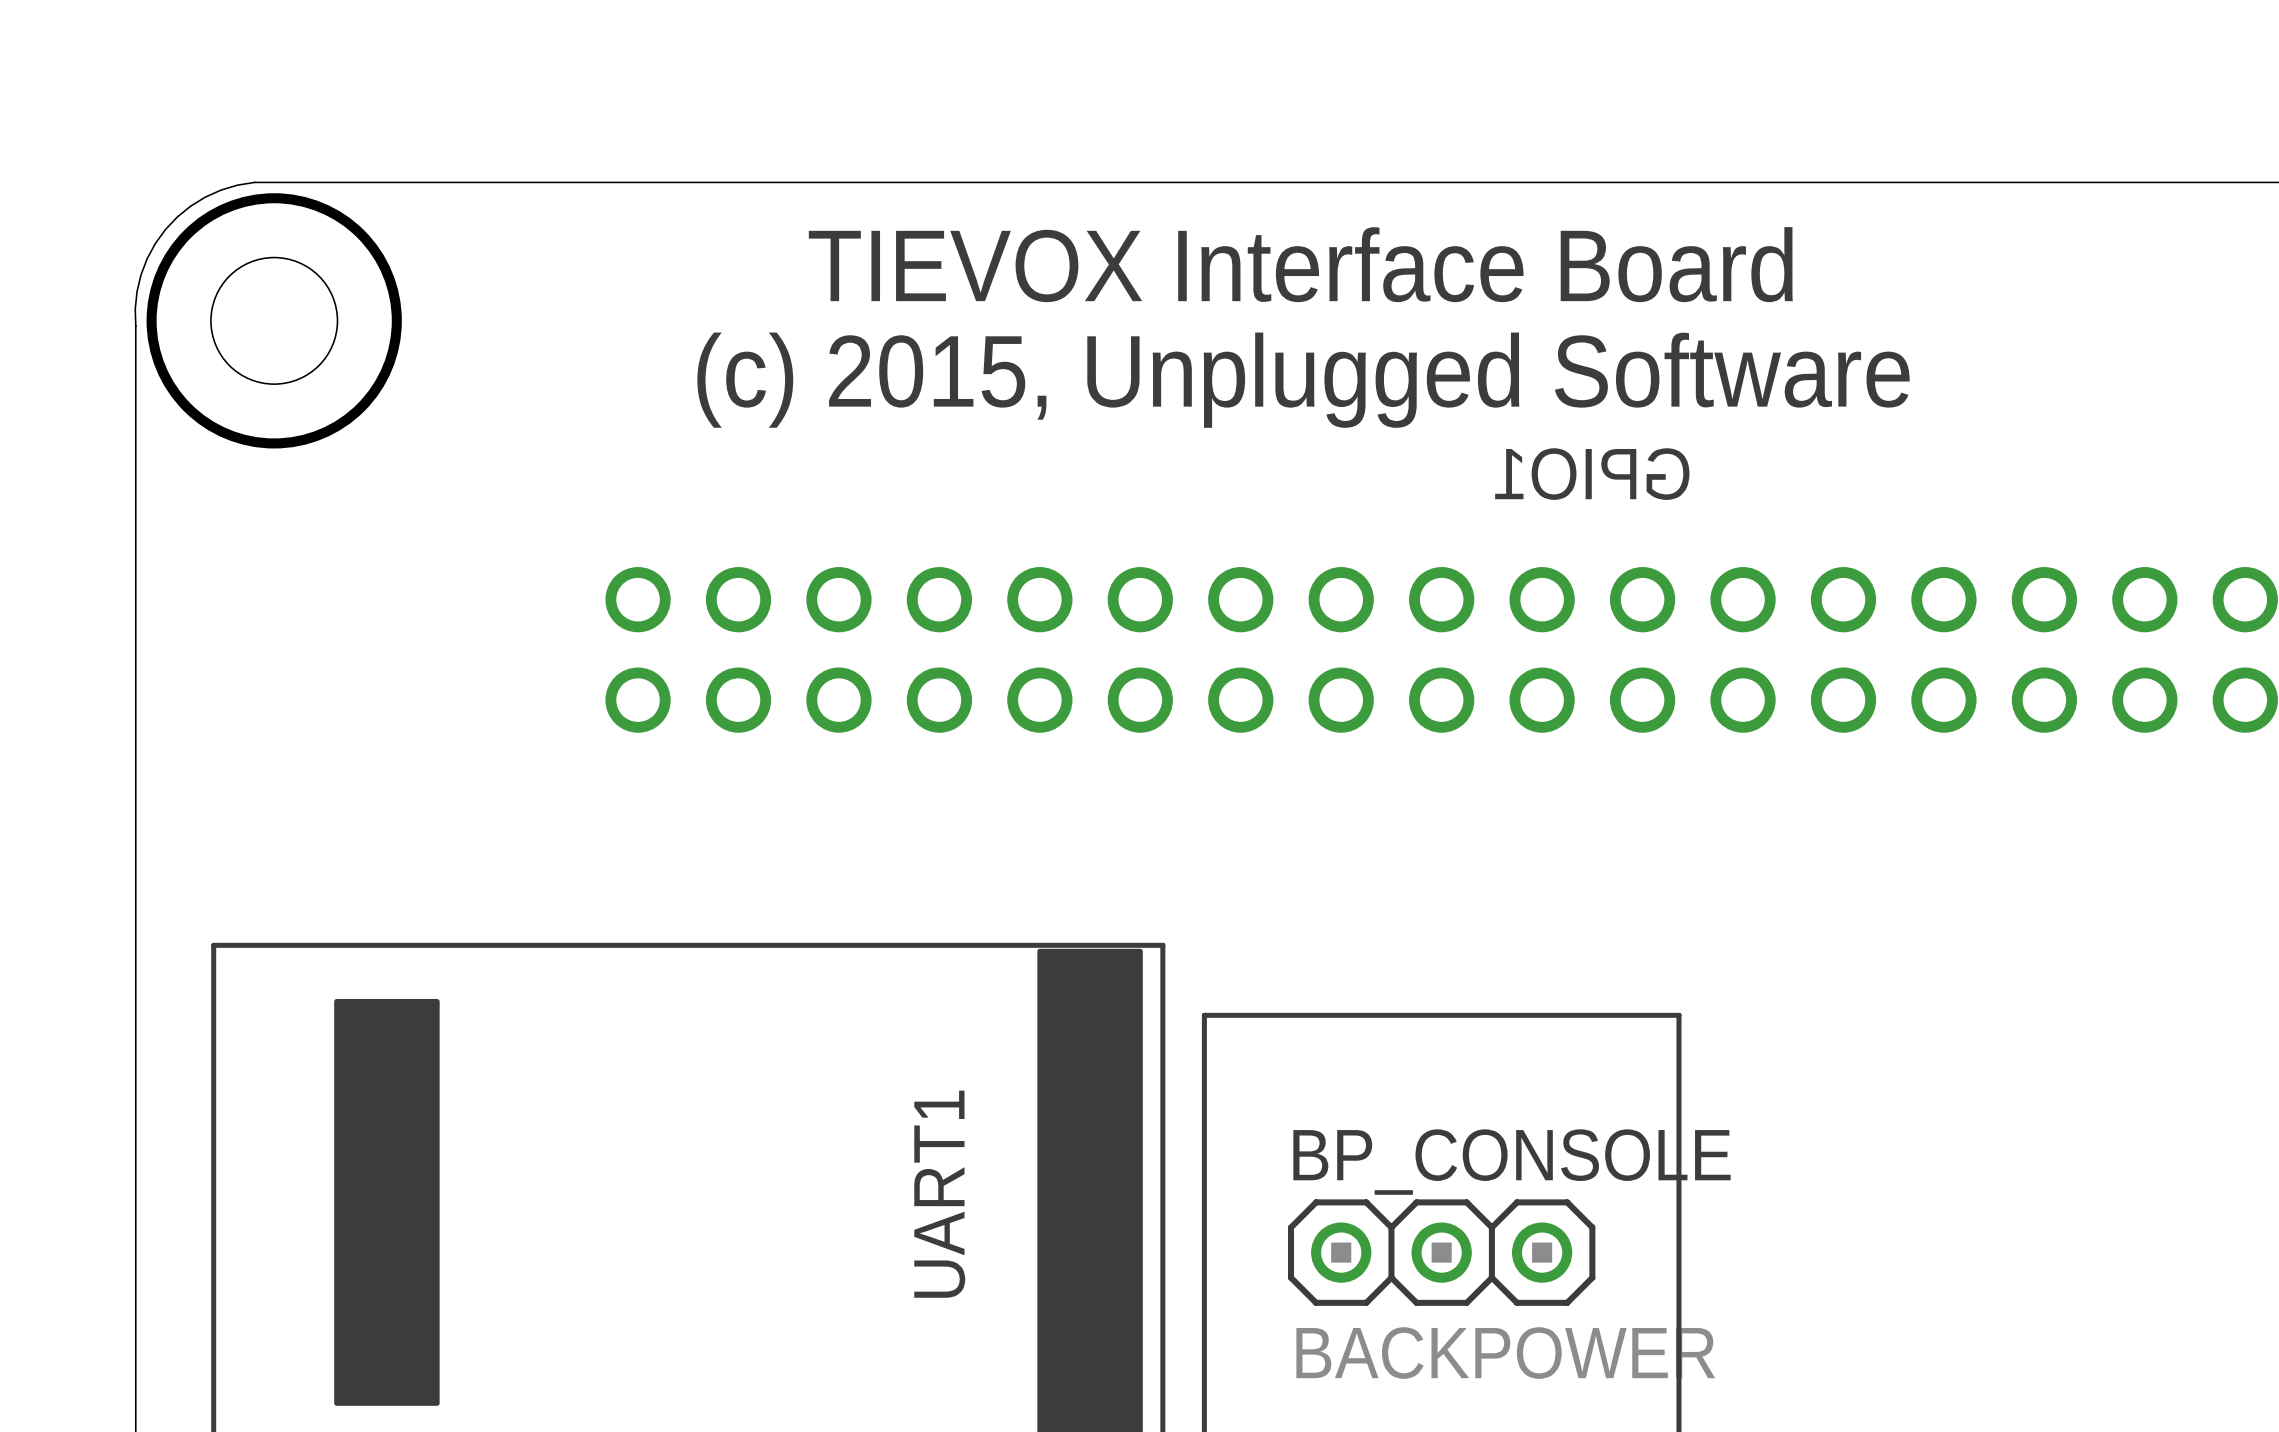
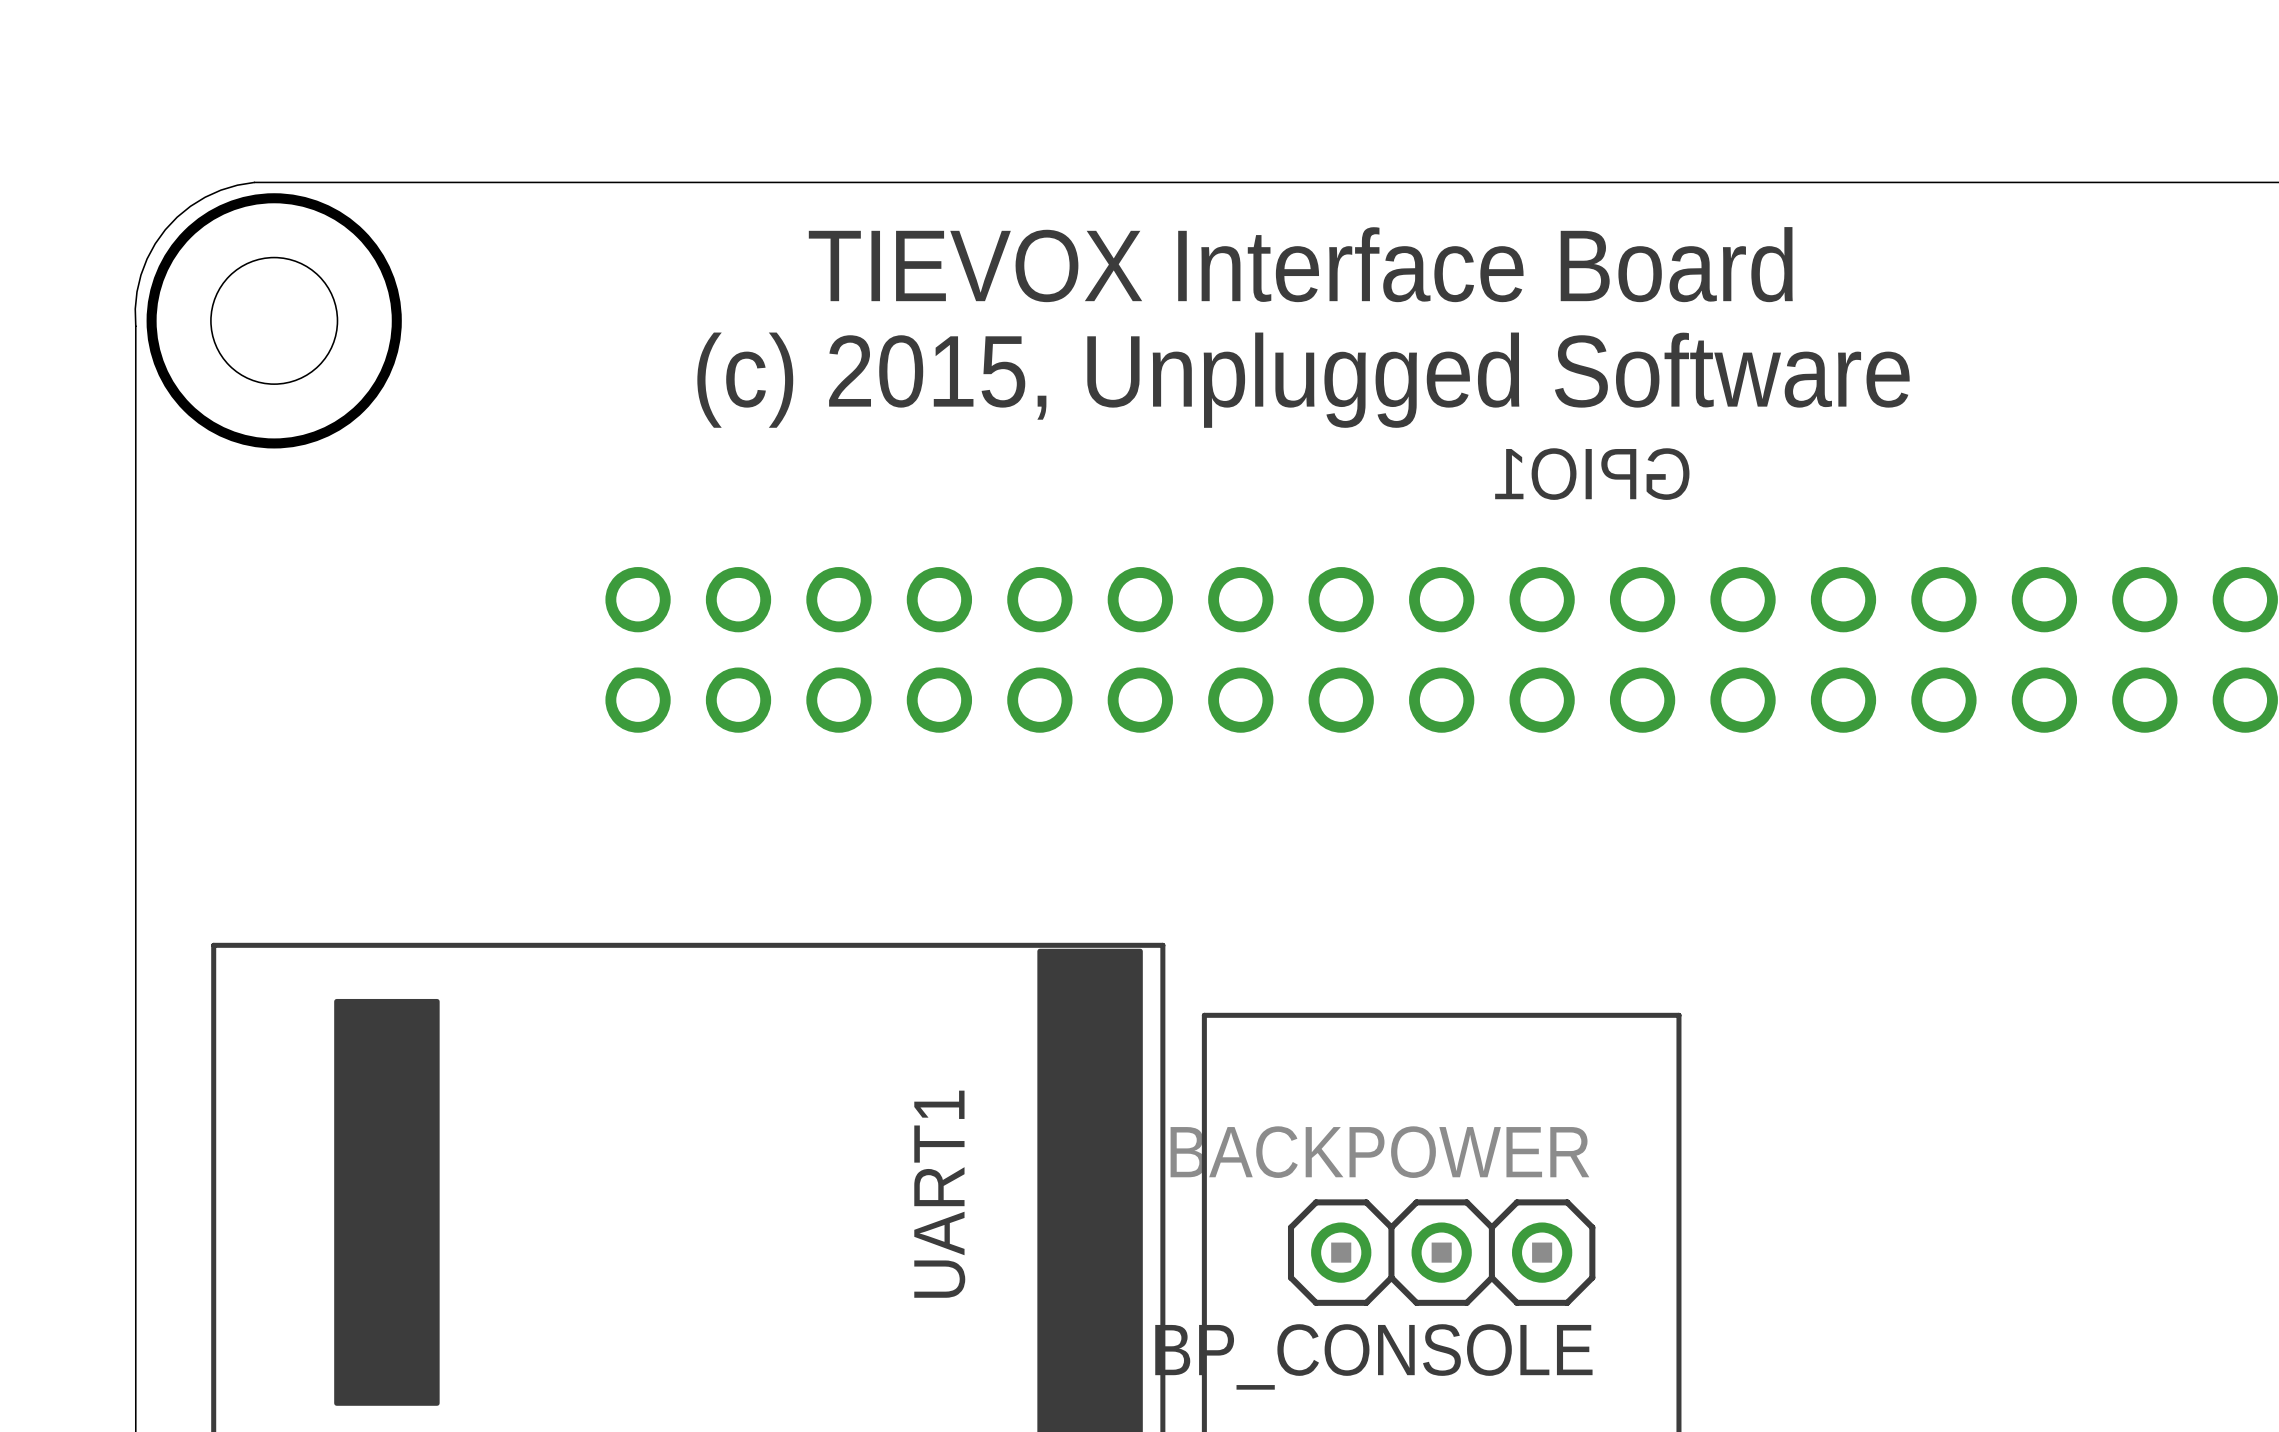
BP_CONSOLE name position: BP_CONSOLE (1512, 1162) -> BP_CONSOLE (1373, 1356)
BP_CONSOLE value position: BACKPOWER (1505, 1353) -> BACKPOWER (1379, 1152)

